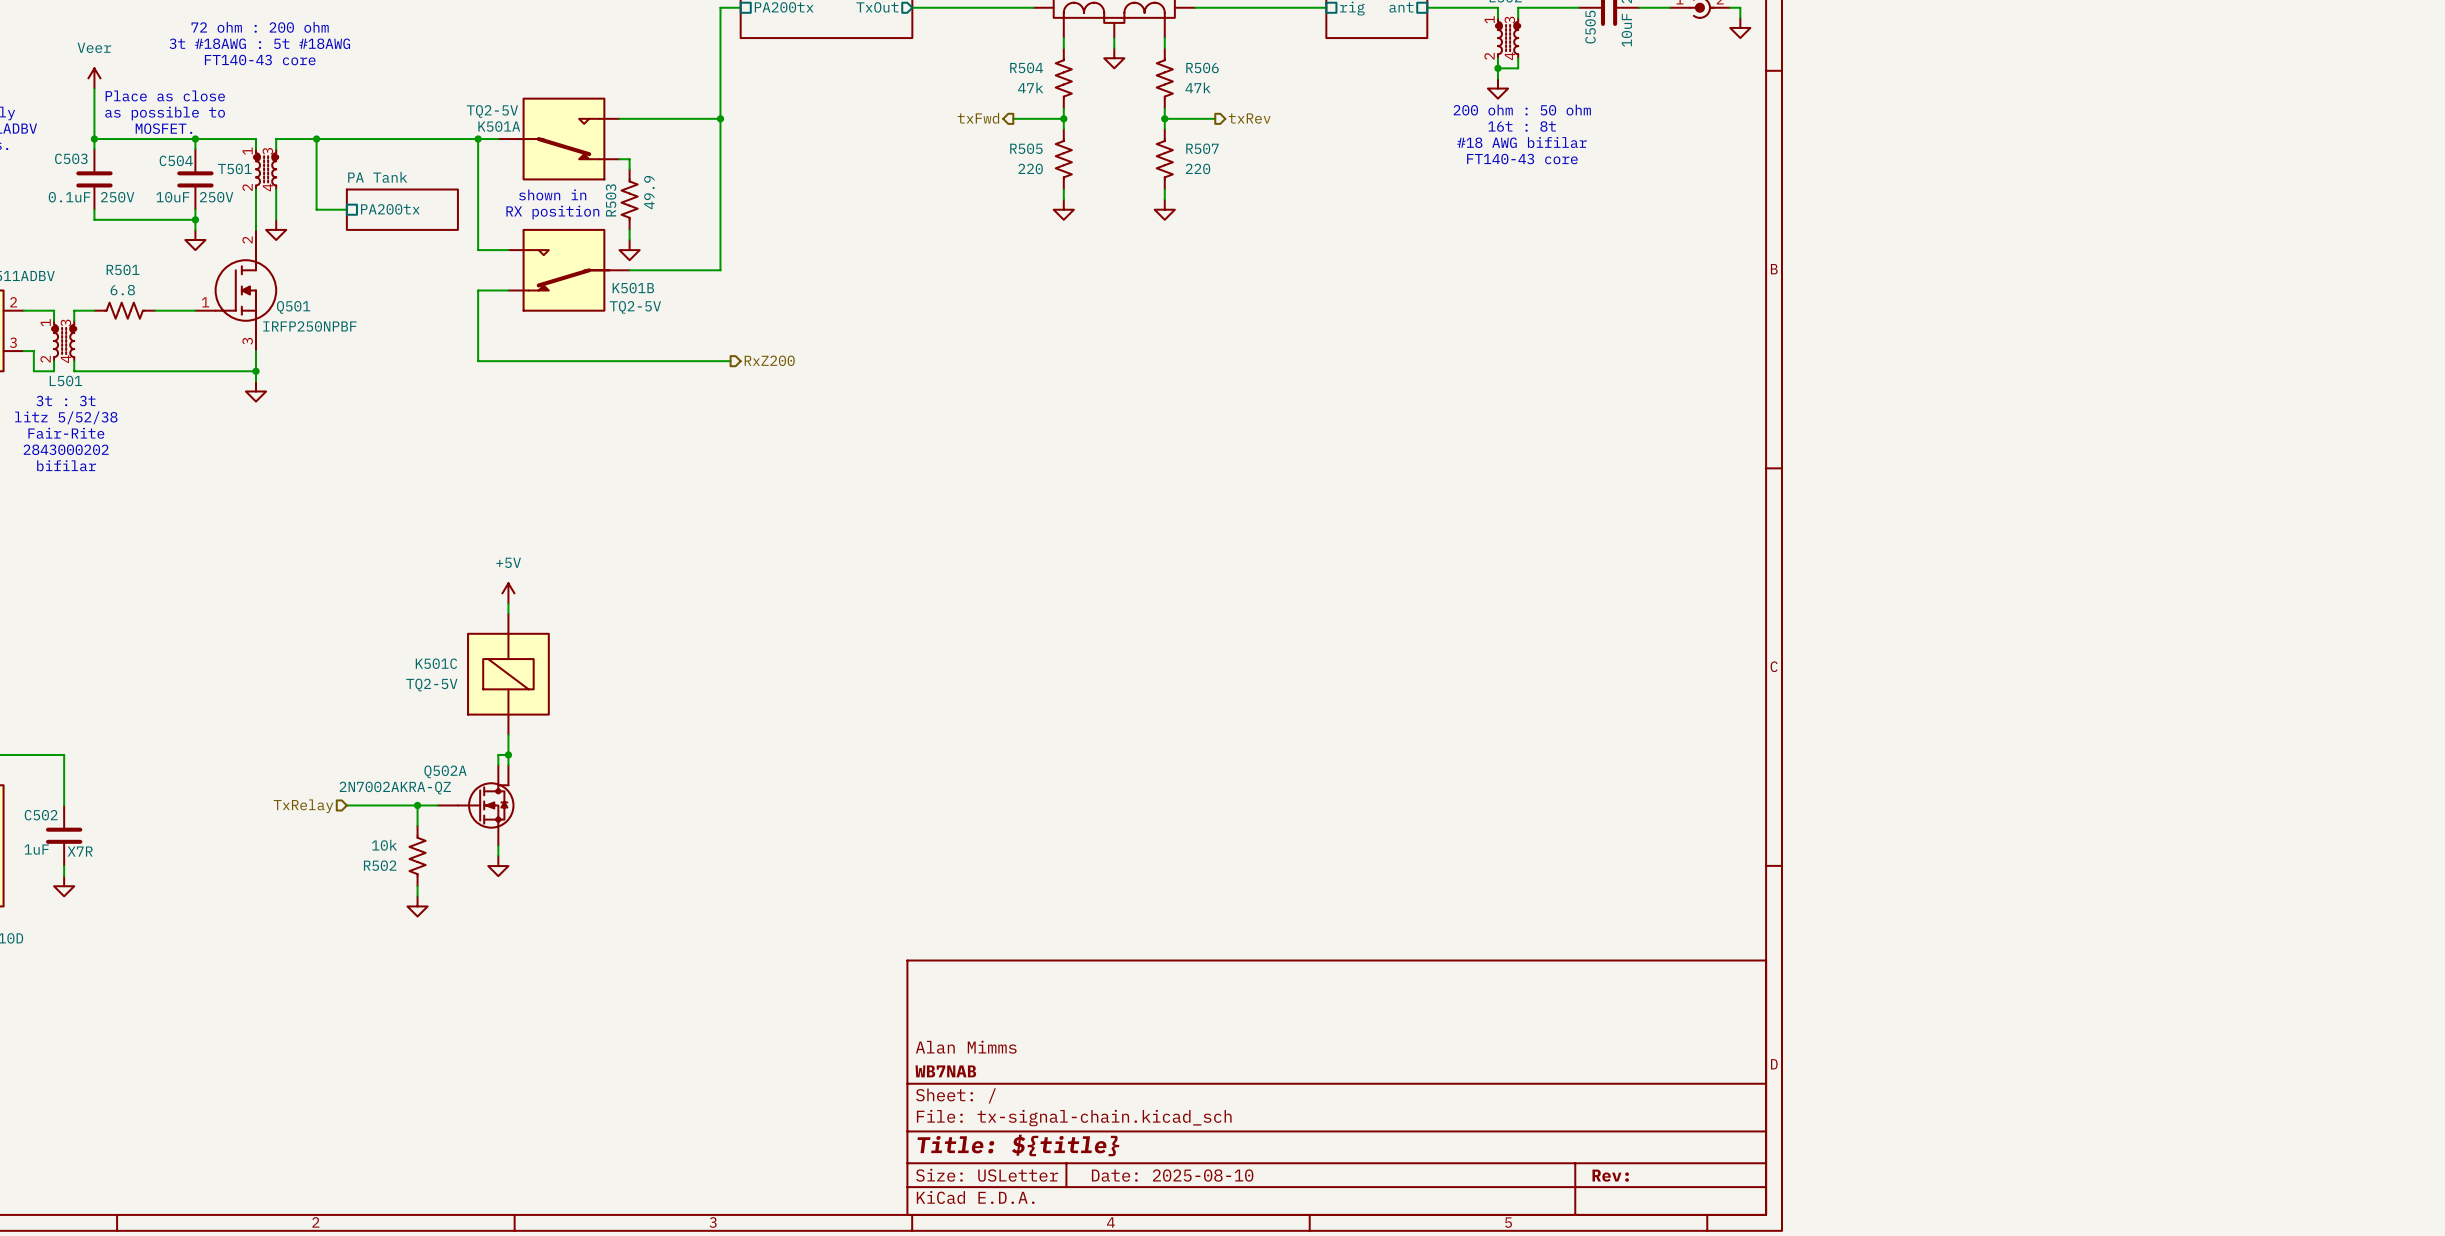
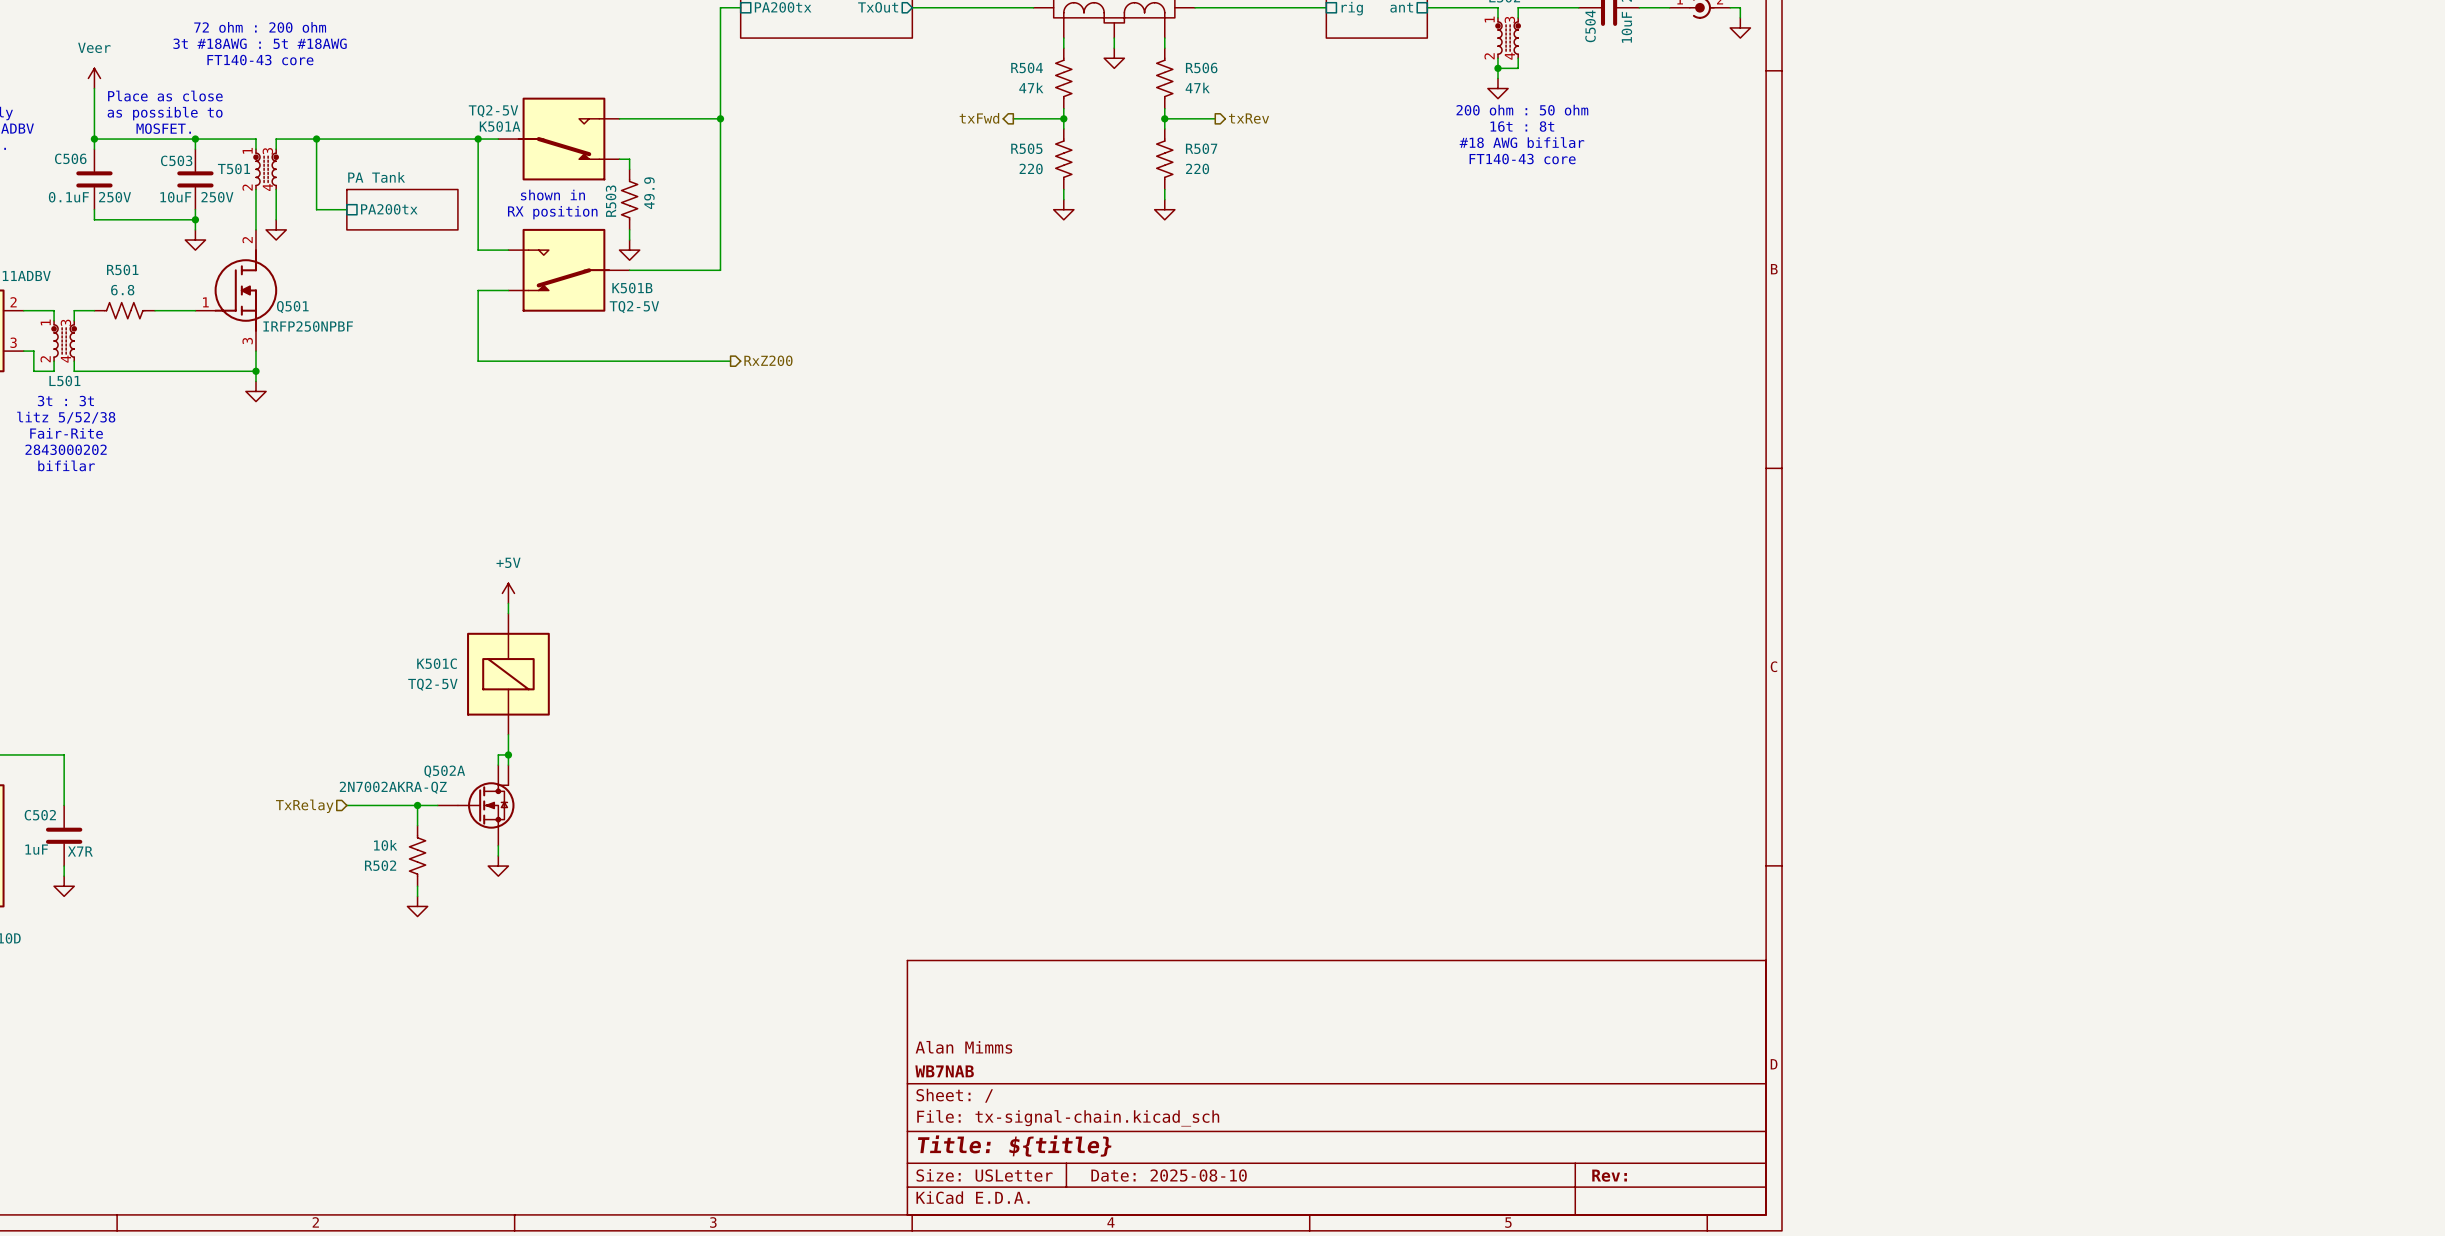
C505 name: C505 (1590, 27) -> C504 (1590, 26)
C503 name: C503 (71, 158) -> C506 (70, 158)
C504 name: C504 (176, 160) -> C503 (176, 160)

